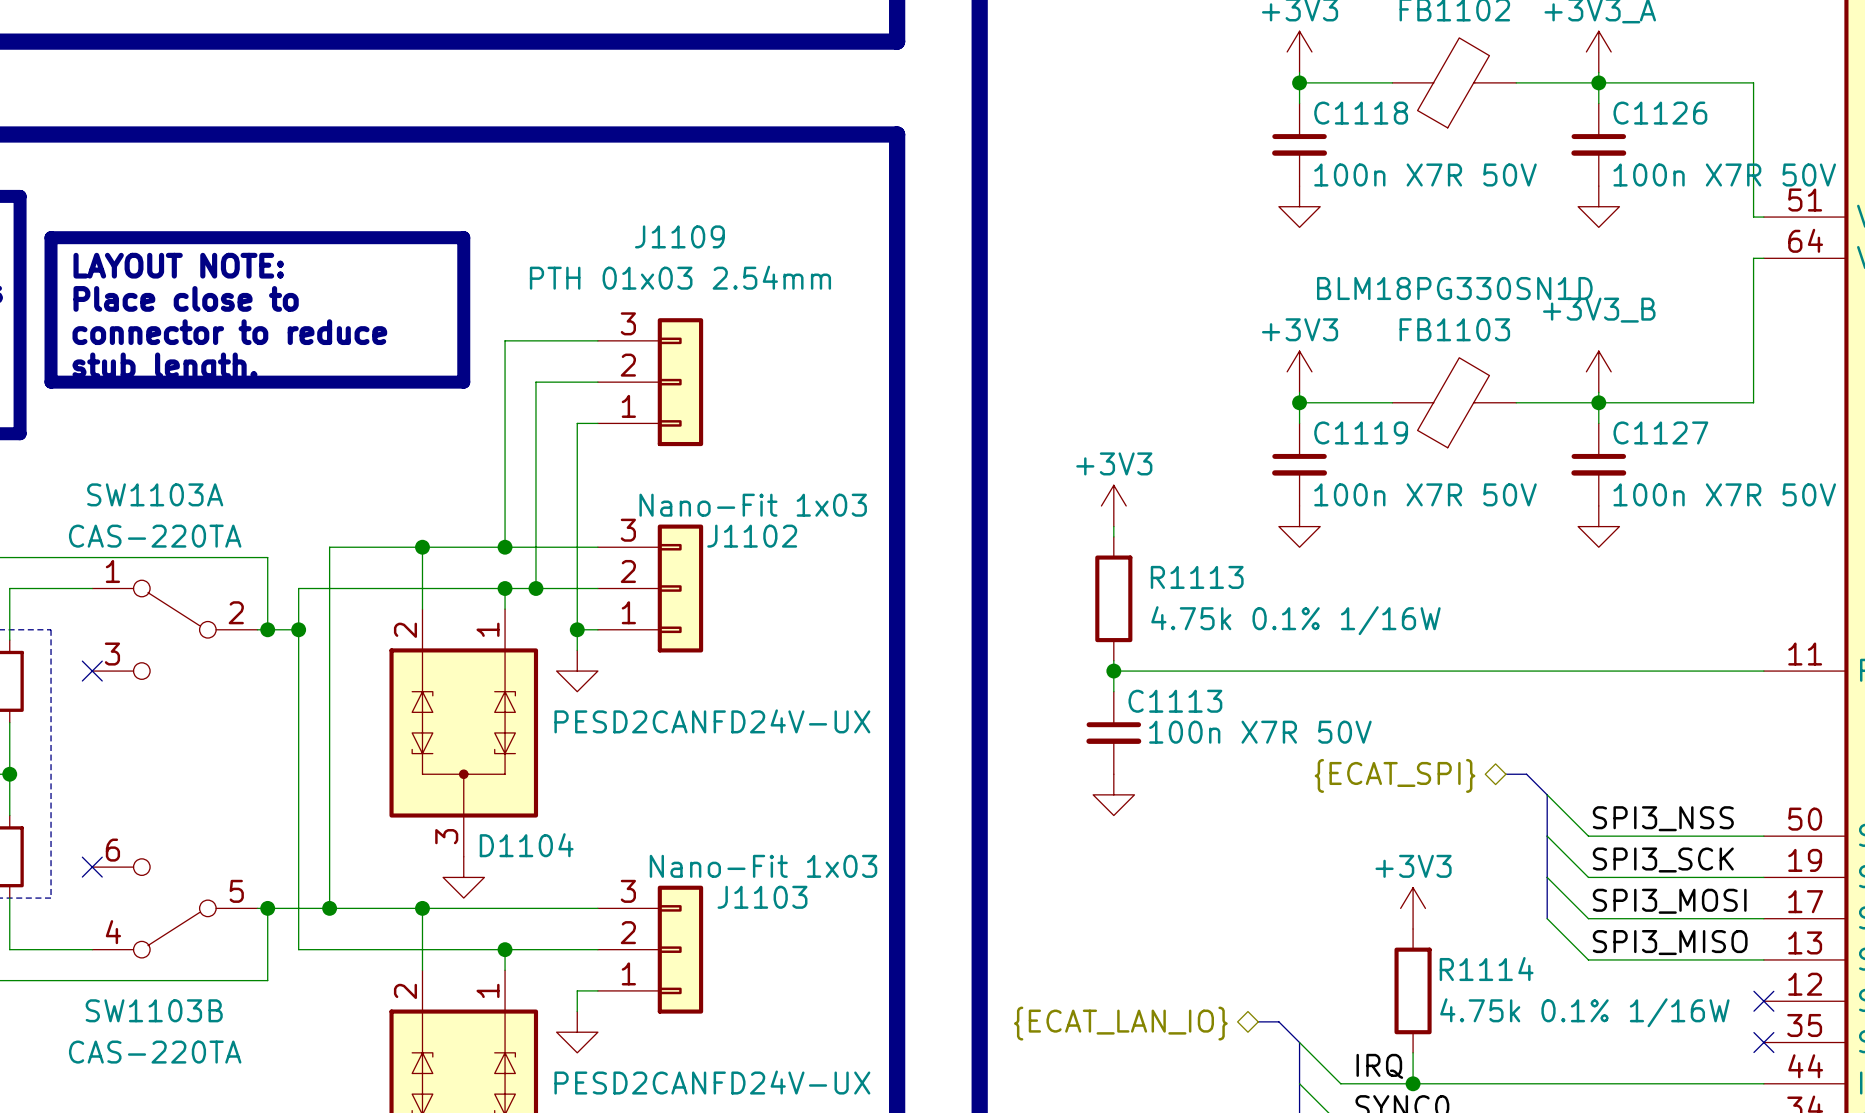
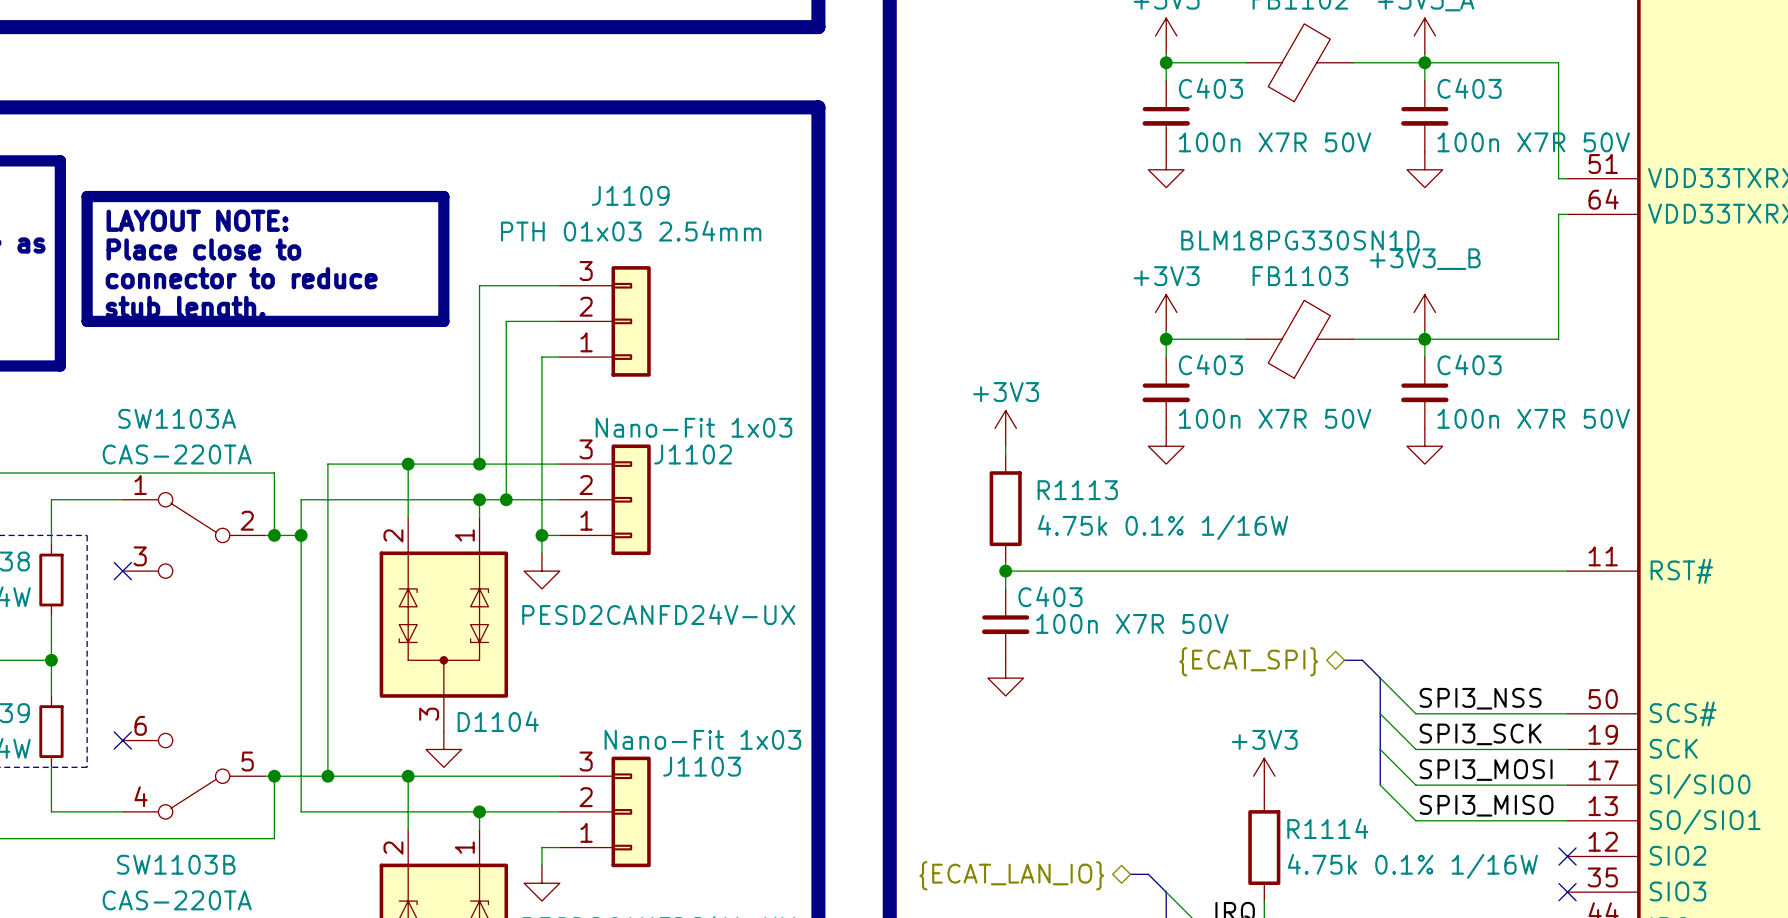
C1118 name: C1118 (1361, 113) -> C403 (1210, 88)
C1126 name: C1126 (1660, 113) -> C403 (1469, 88)
power symbol: +3V3_B (1598, 371) -> +3V3__B (1424, 312)
C1119 name: C1119 (1361, 432) -> C403 (1210, 364)
C1127 name: C1127 (1660, 432) -> C403 (1469, 364)
C1113 name: C1113 (1175, 701) -> C403 (1050, 596)

